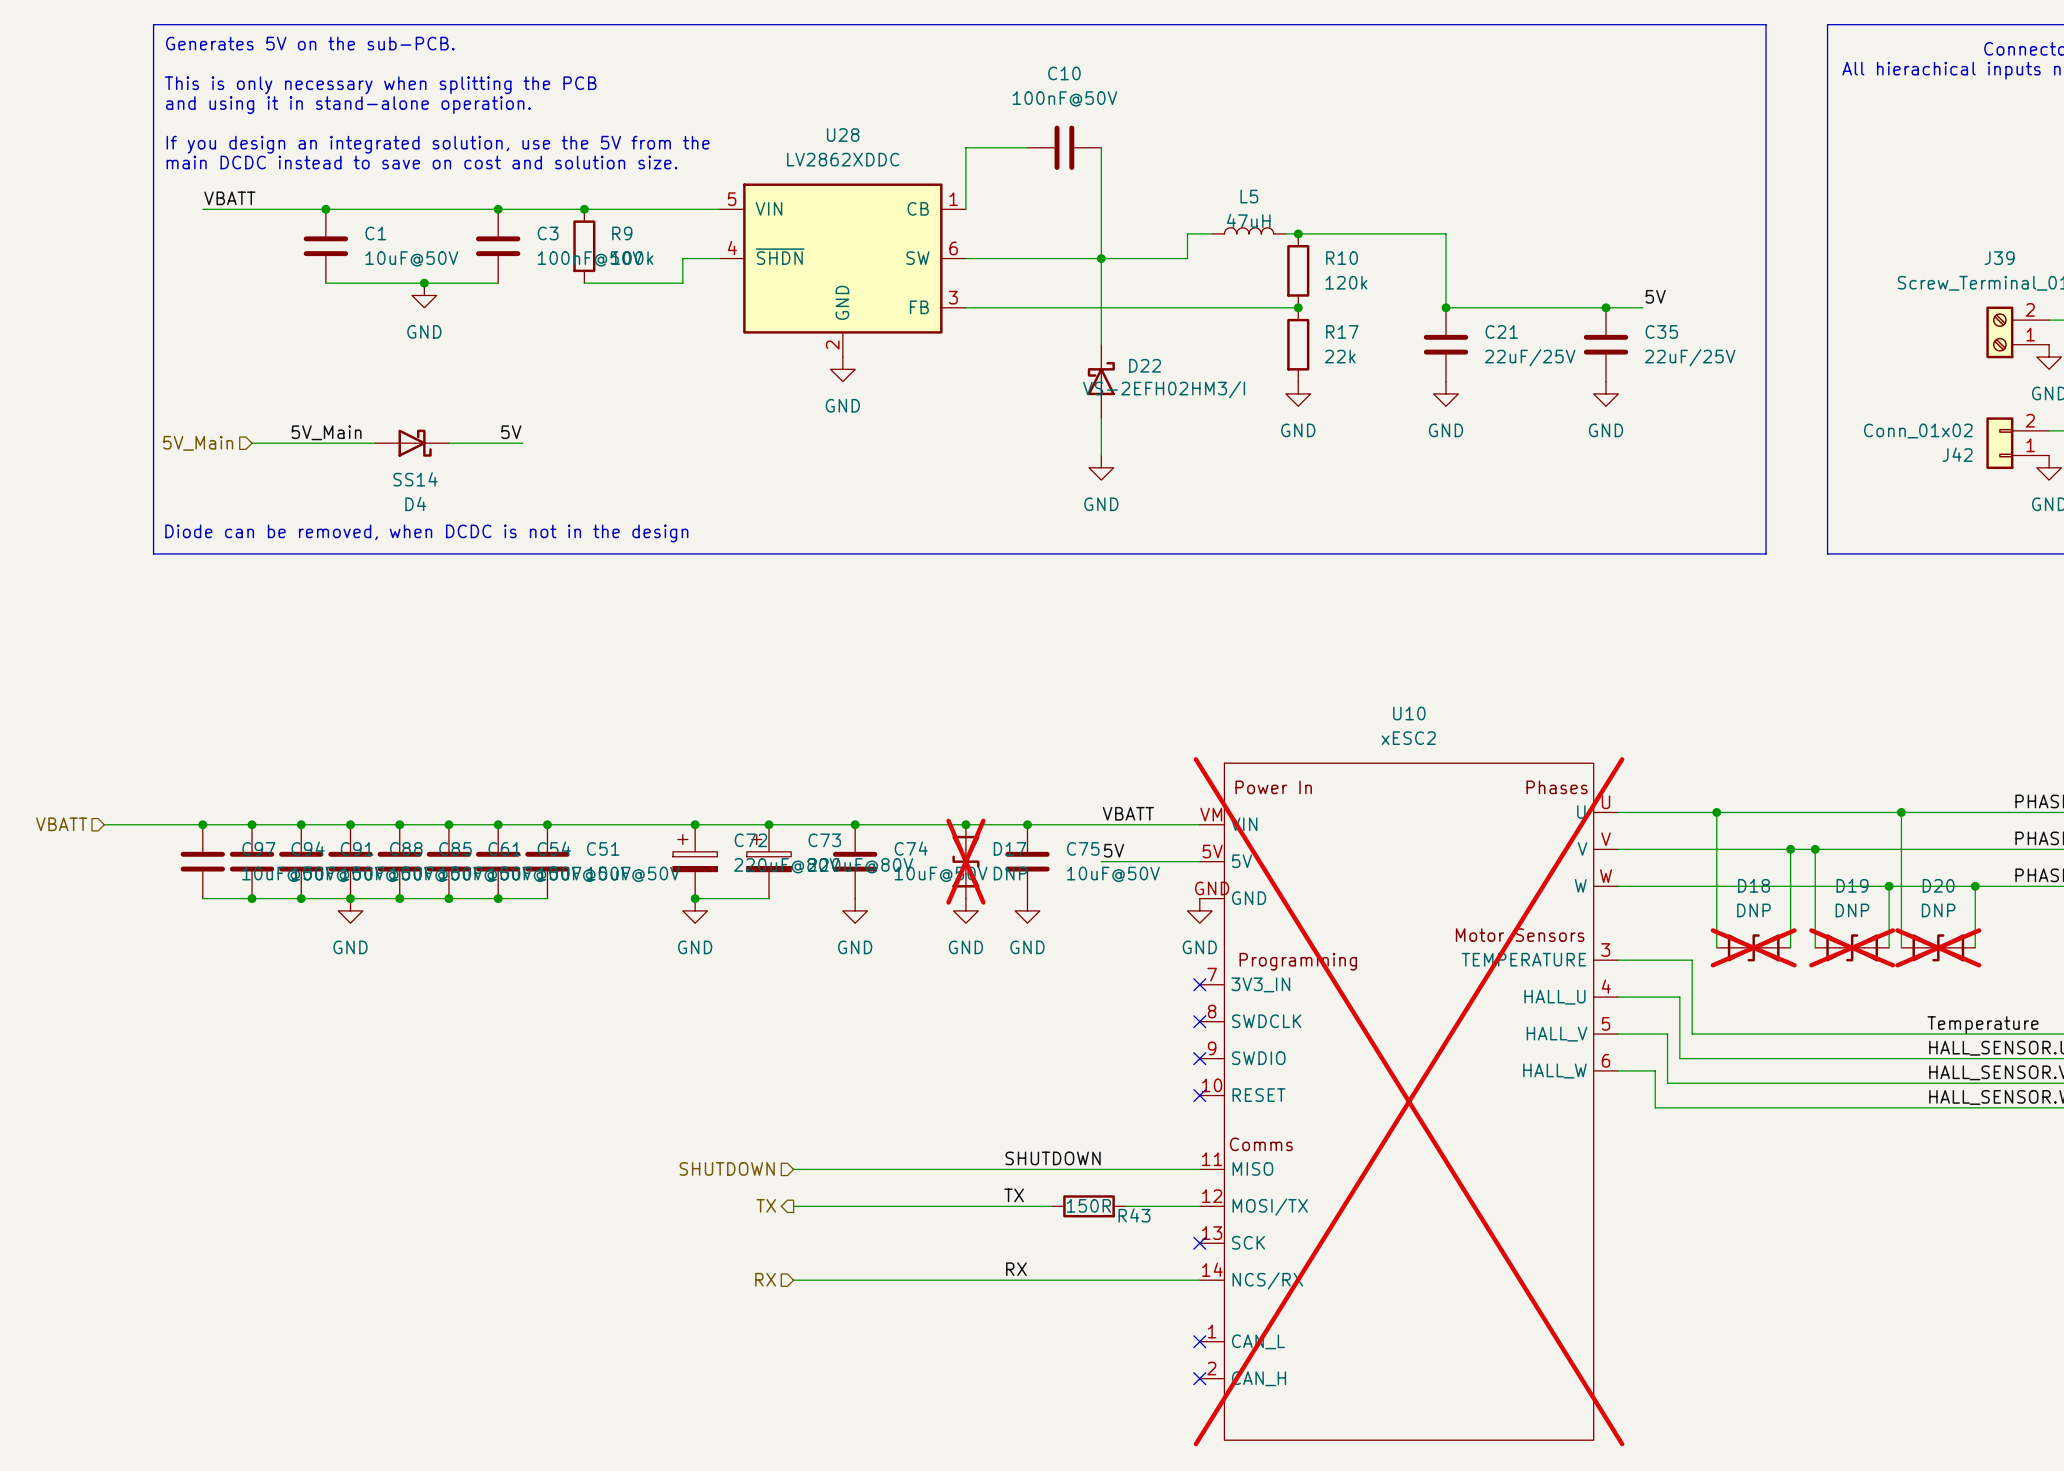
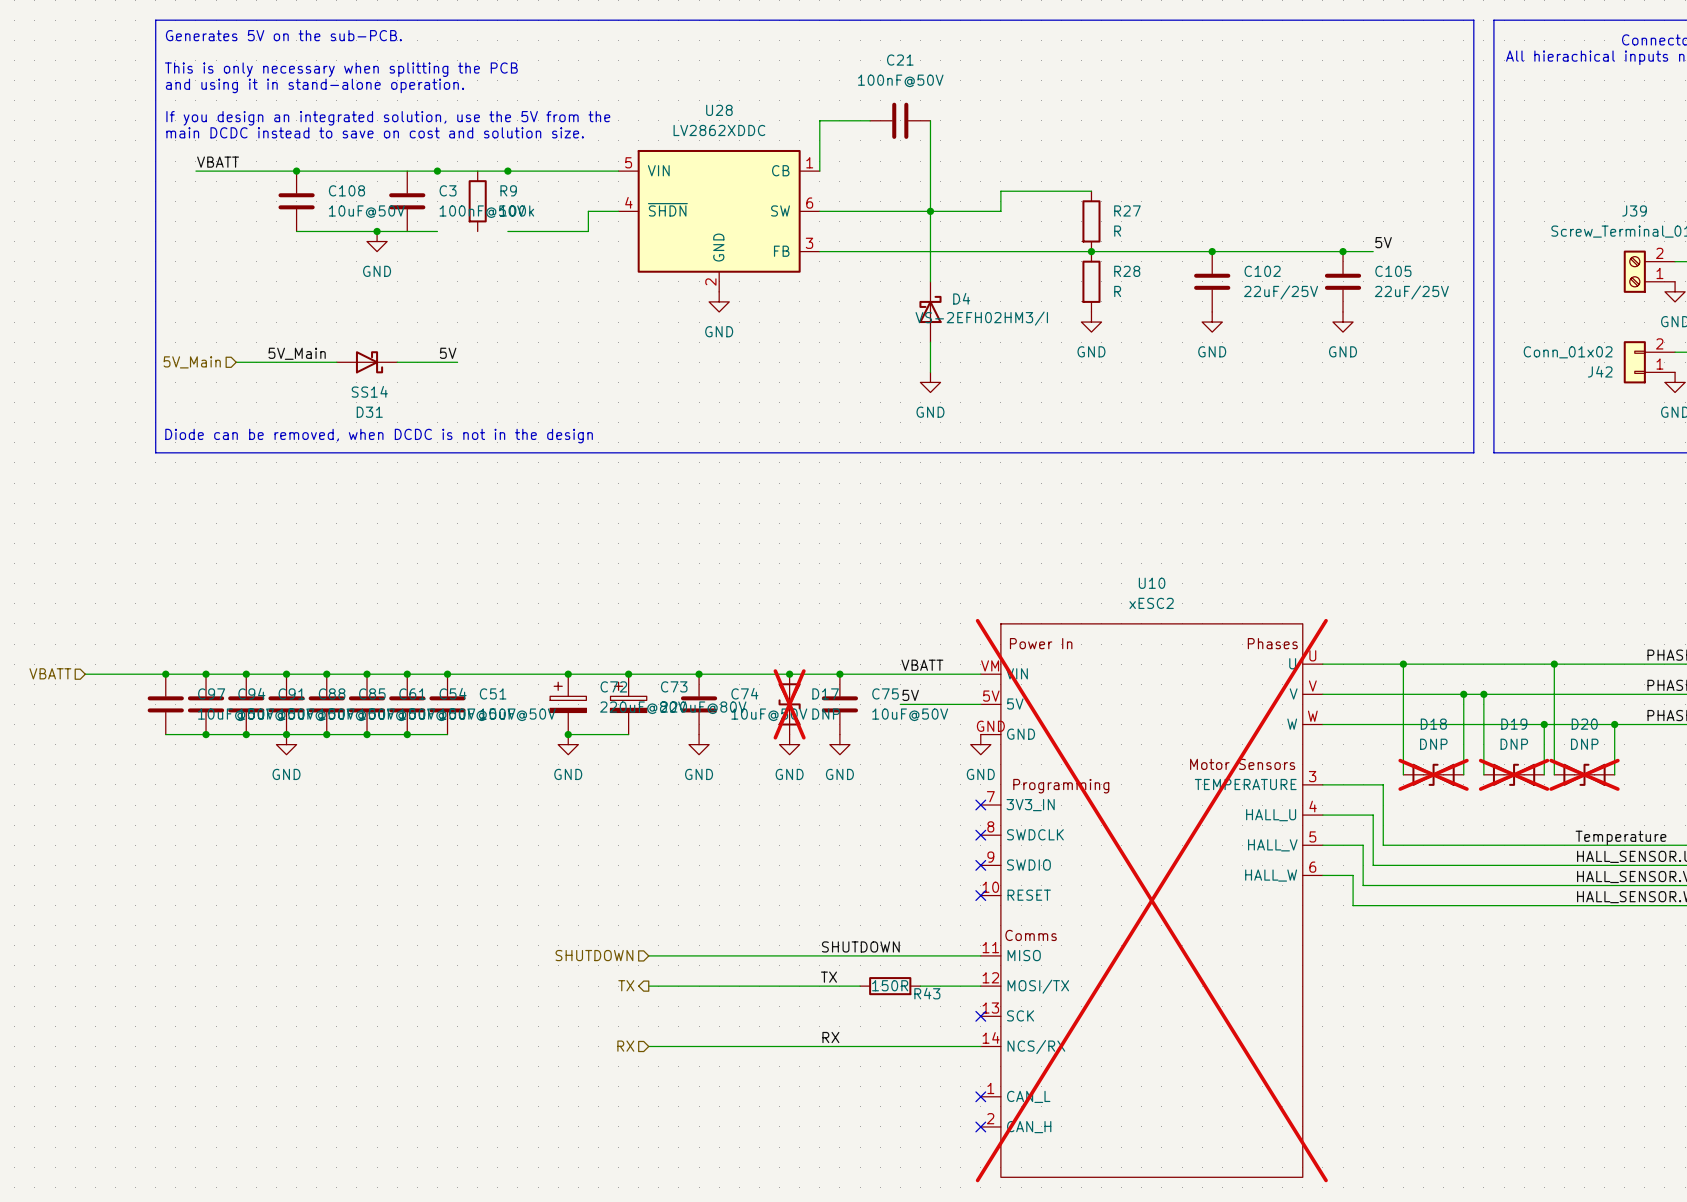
line: (190, 24) (153, 24) (153, 553) (190, 553) -> (155, 20) (155, 452)
line: (1766, 24) (1766, 553) -> (1443, 20) (1473, 20) (1473, 452) (1443, 452)
text position: Generates 5V on the sub-PCB. (310, 43) -> Generates 5V on the sub-PCB. (283, 35)
text position: This is only necessary when splitting the PCB (380, 85) -> This is only necessary when splitting the PCB (341, 69)
text position: and using it in stand-alone operation. (348, 105) -> and using it in stand-alone operation. (315, 85)
text position: If you design an integrated solution, use the 5V from the (438, 144) -> If you design an integrated solution, use the 5V from the (388, 118)
wire: (1002, 147) (965, 147) (965, 209) -> (819, 120) (819, 171)
C10: 100nF@50V (1064, 147) -> none
wire: (1101, 147) (1101, 344) -> (930, 120) (930, 281)
text position: main DCDC instead to save on cost and solution size. (421, 162) -> main DCDC instead to save on cost and solution size. (375, 132)
label position: VBATT (229, 198) -> VBATT (218, 162)
wire: (202, 209) (239, 209) -> none
junction position: (325, 209) -> (296, 171)
junction: (498, 209) -> none
junction: none -> (437, 171)
junction: (584, 209) -> none
junction: none -> (507, 171)
L5: 47uH (1249, 230) -> none
wire: (1212, 233) (1187, 233) (1187, 258) -> (1051, 191) (1000, 191) (1000, 211) (970, 211)
junction: (1298, 233) -> none
wire: (1335, 233) (1445, 233) (1445, 307) -> (1061, 251) (1182, 251)
C1: 10uF@50V (325, 246) -> none
C108: none -> 10uF@50V (296, 201)
wire: (719, 258) (682, 258) (682, 283) -> (618, 211) (588, 211) (588, 231) (558, 231)
junction position: (1101, 258) -> (930, 211)
U28 position: (842, 270) -> (719, 220)
R10: 120k (1298, 270) -> none
R27: none -> R (1091, 221)
wire: (325, 283) (362, 283) -> none
junction position: (424, 283) -> (377, 231)
wire: (584, 283) (621, 283) -> (407, 231) (437, 231)
power symbol position: GND (424, 295) -> GND (377, 241)
label position: 5V (1655, 296) -> 5V (1383, 242)
junction position: (1298, 307) -> (1091, 251)
junction position: (1445, 307) -> (1212, 251)
junction position: (1606, 307) -> (1343, 251)
wire: none -> (1343, 251) (1373, 251)
C21 name position: C21 (1501, 331) -> C21 (900, 60)
R17: 22k (1298, 344) -> none
R28: none -> R (1091, 281)
C21 rotation: 0° (1445, 344) -> 90° clockwise (900, 120)
C21 position: (1445, 344) -> (900, 120)
C102: none -> 22uF/25V (1212, 281)
C35: 22uF/25V (1606, 344) -> none
C105: none -> 22uF/25V (1343, 281)
C21 value: 22uF/25V (1530, 357) -> 100nF@50V (900, 80)
power symbol position: GND (842, 369) -> GND (719, 301)
D22: VS-2EFH02HM3/I (1101, 381) -> none
power symbol position: GND (1298, 393) -> GND (1091, 322)
power symbol position: GND (1445, 393) -> GND (1212, 322)
power symbol position: GND (1606, 393) -> GND (1343, 322)
wire: (1101, 418) (1101, 455) -> (930, 342) (930, 372)
label position: 5V_Main (326, 432) -> 5V_Main (297, 353)
label position: 5V (511, 432) -> 5V (448, 353)
hierarchical label position: 5V_Main (198, 443) -> 5V_Main (192, 362)
wire: (252, 443) (288, 443) -> none
D4 position: (412, 443) -> (930, 311)
D4 rotation: 0° (415, 443) -> 90° counterclockwise (930, 309)
D31: none -> SS14 (367, 362)
wire: none -> (427, 362) (457, 362)
power symbol position: GND (1101, 467) -> GND (930, 382)
D4 value: SS14 (415, 479) -> VS-2EFH02HM3/I (981, 318)
D4 name position: D4 (415, 503) -> D4 (961, 298)
text position: Diode can be removed, when DCDC is not in the design (426, 533) -> Diode can be removed, when DCDC is not in the design (379, 436)

